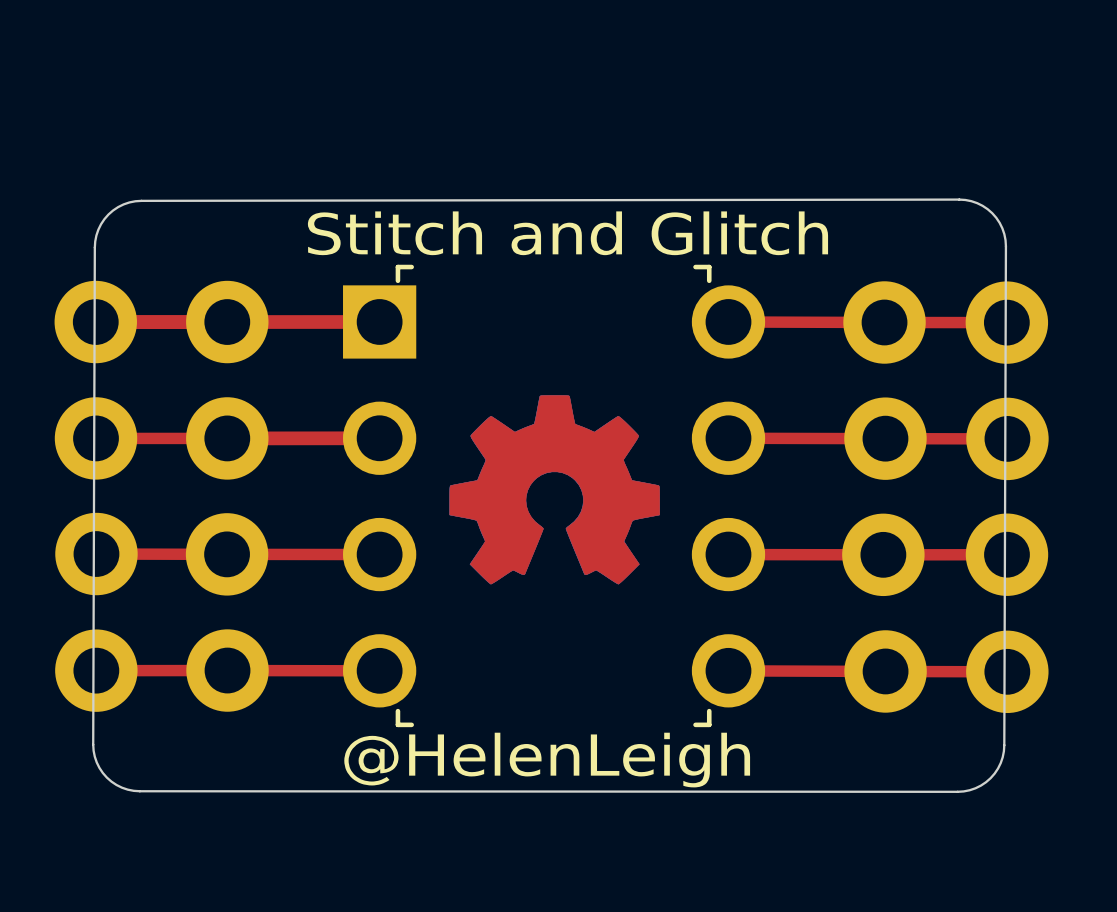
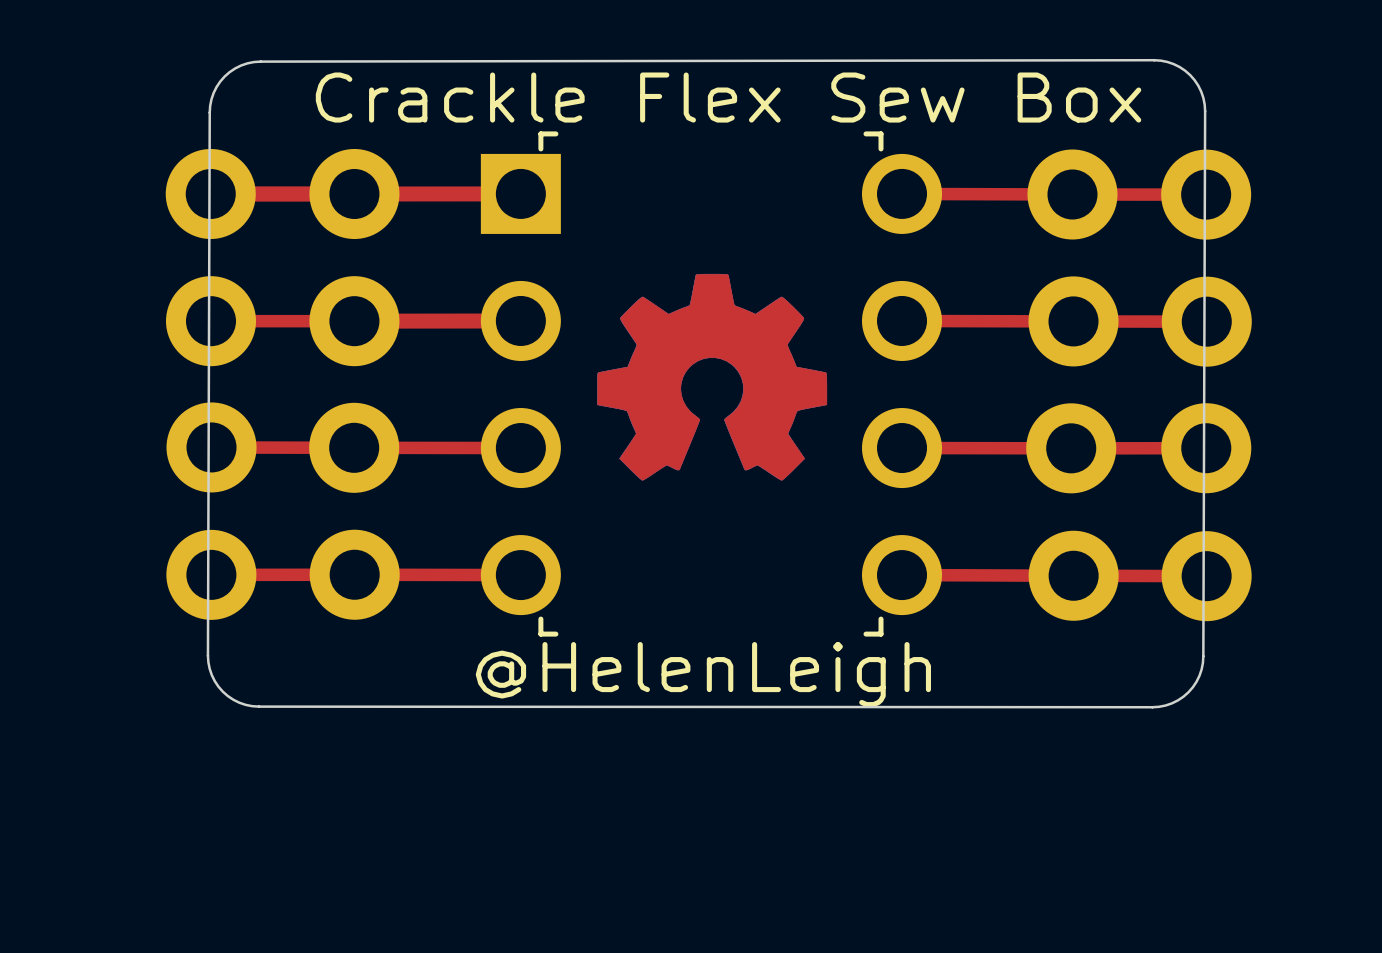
text: Stitch and Glitch (567, 233) -> Crackle Flex Sew Box (728, 97)

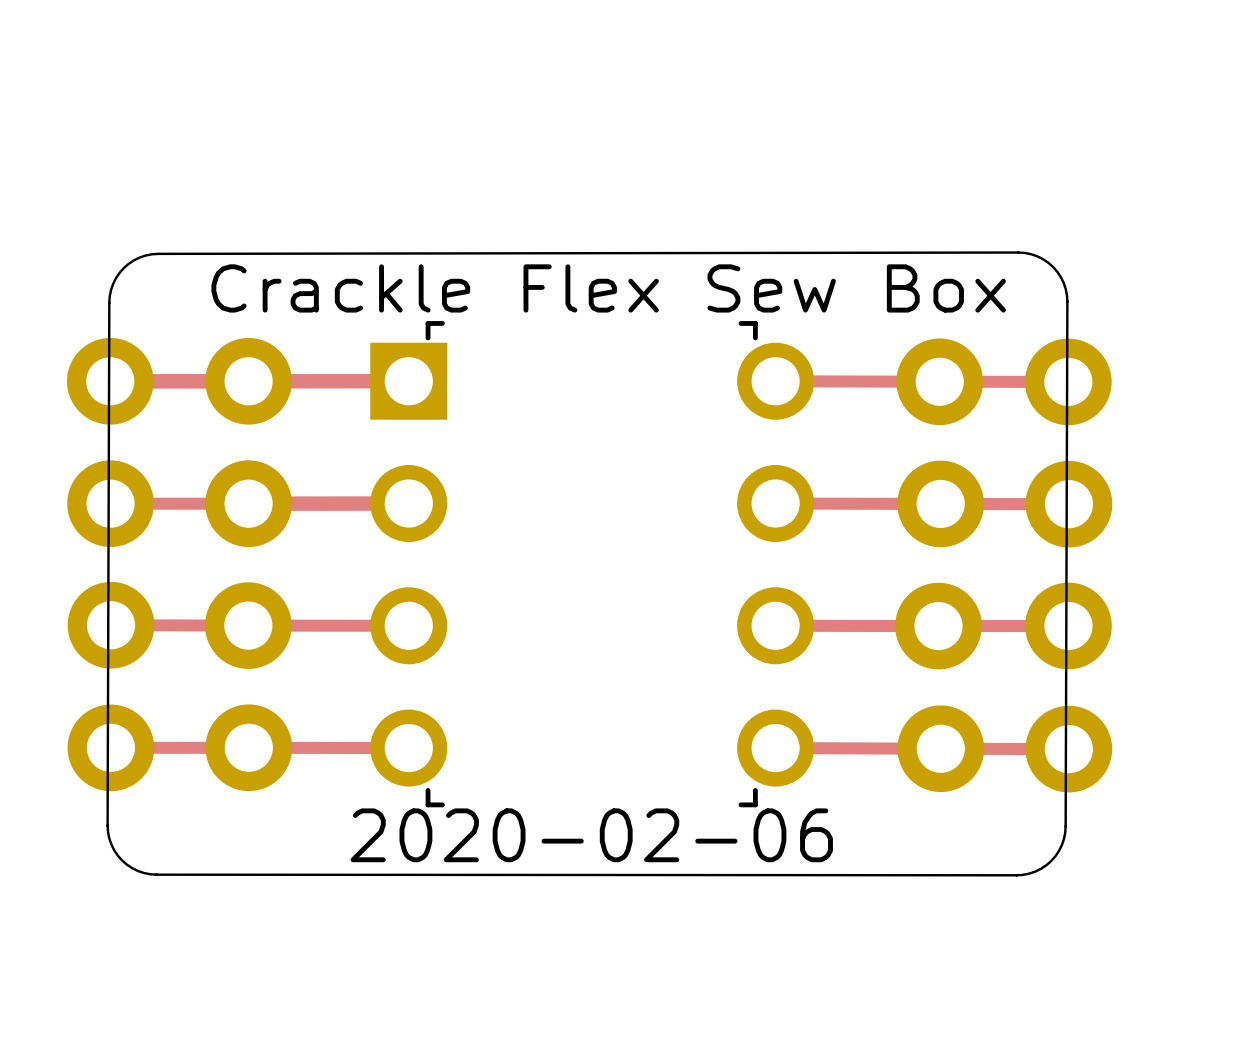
drawing: [597, 273, 828, 481] -> none
text: @HelenLeigh (703, 674) -> 2020-02-06 (591, 835)

